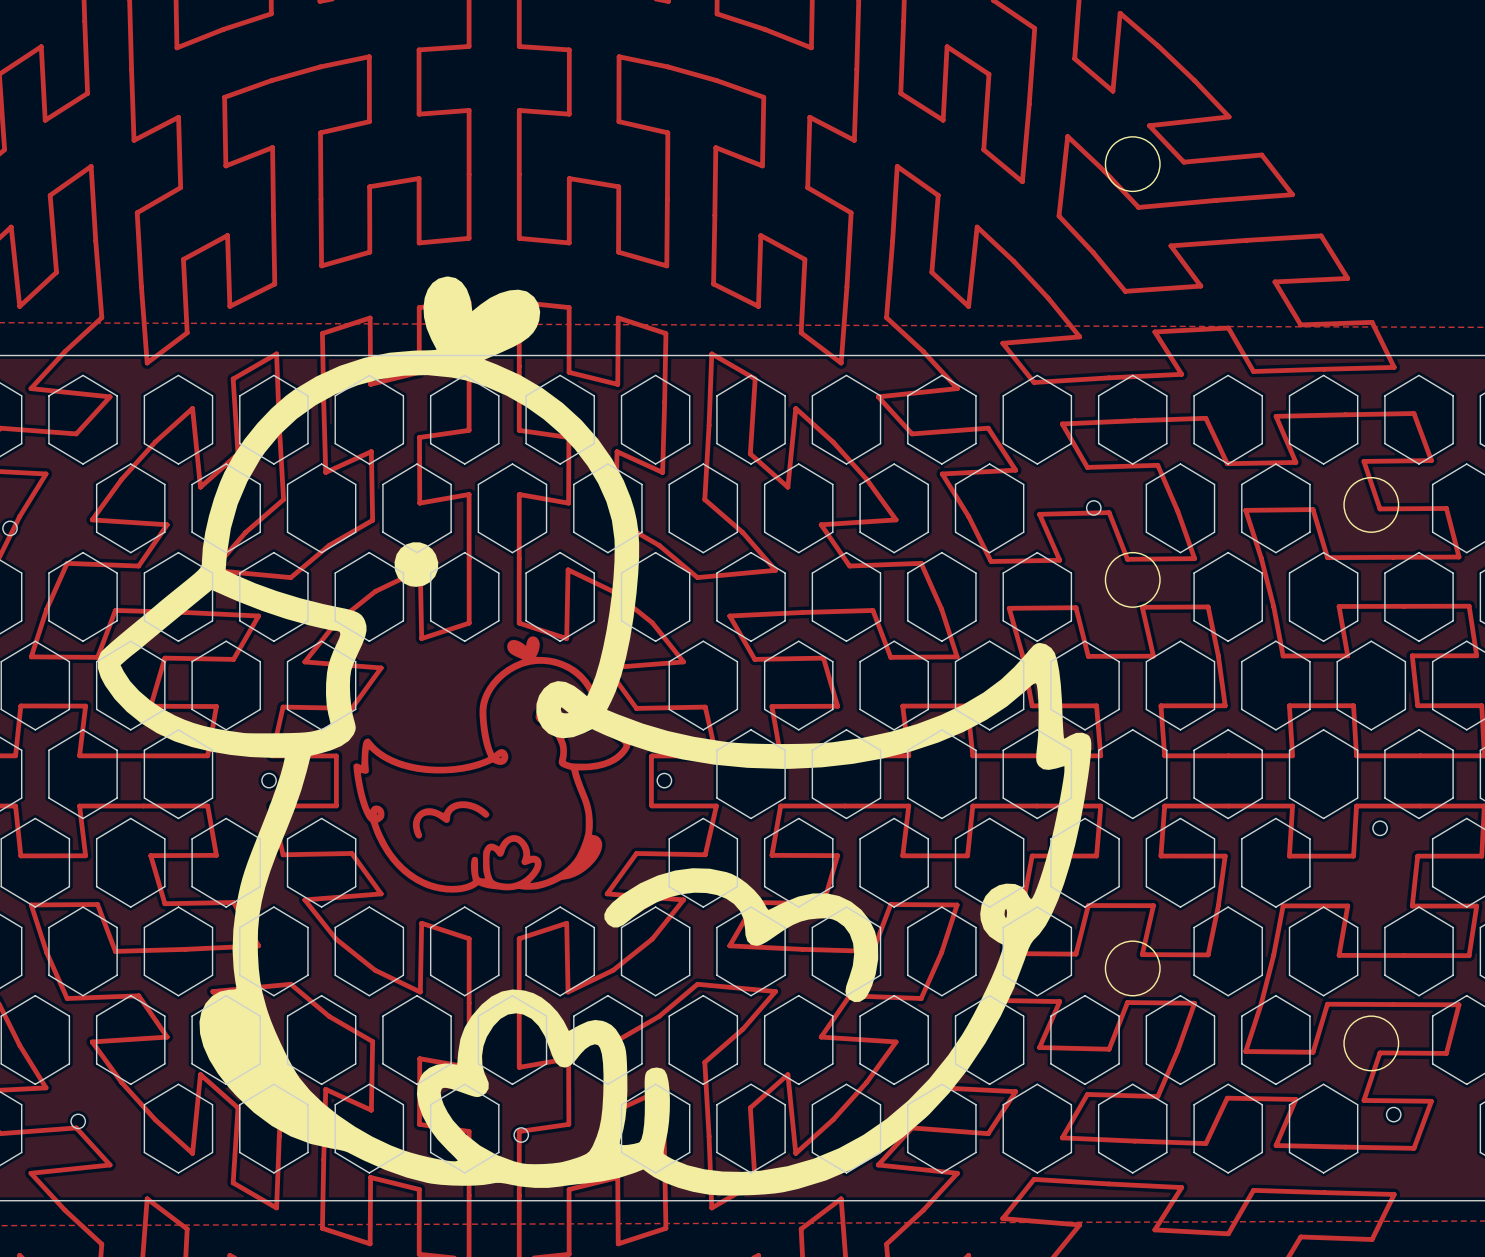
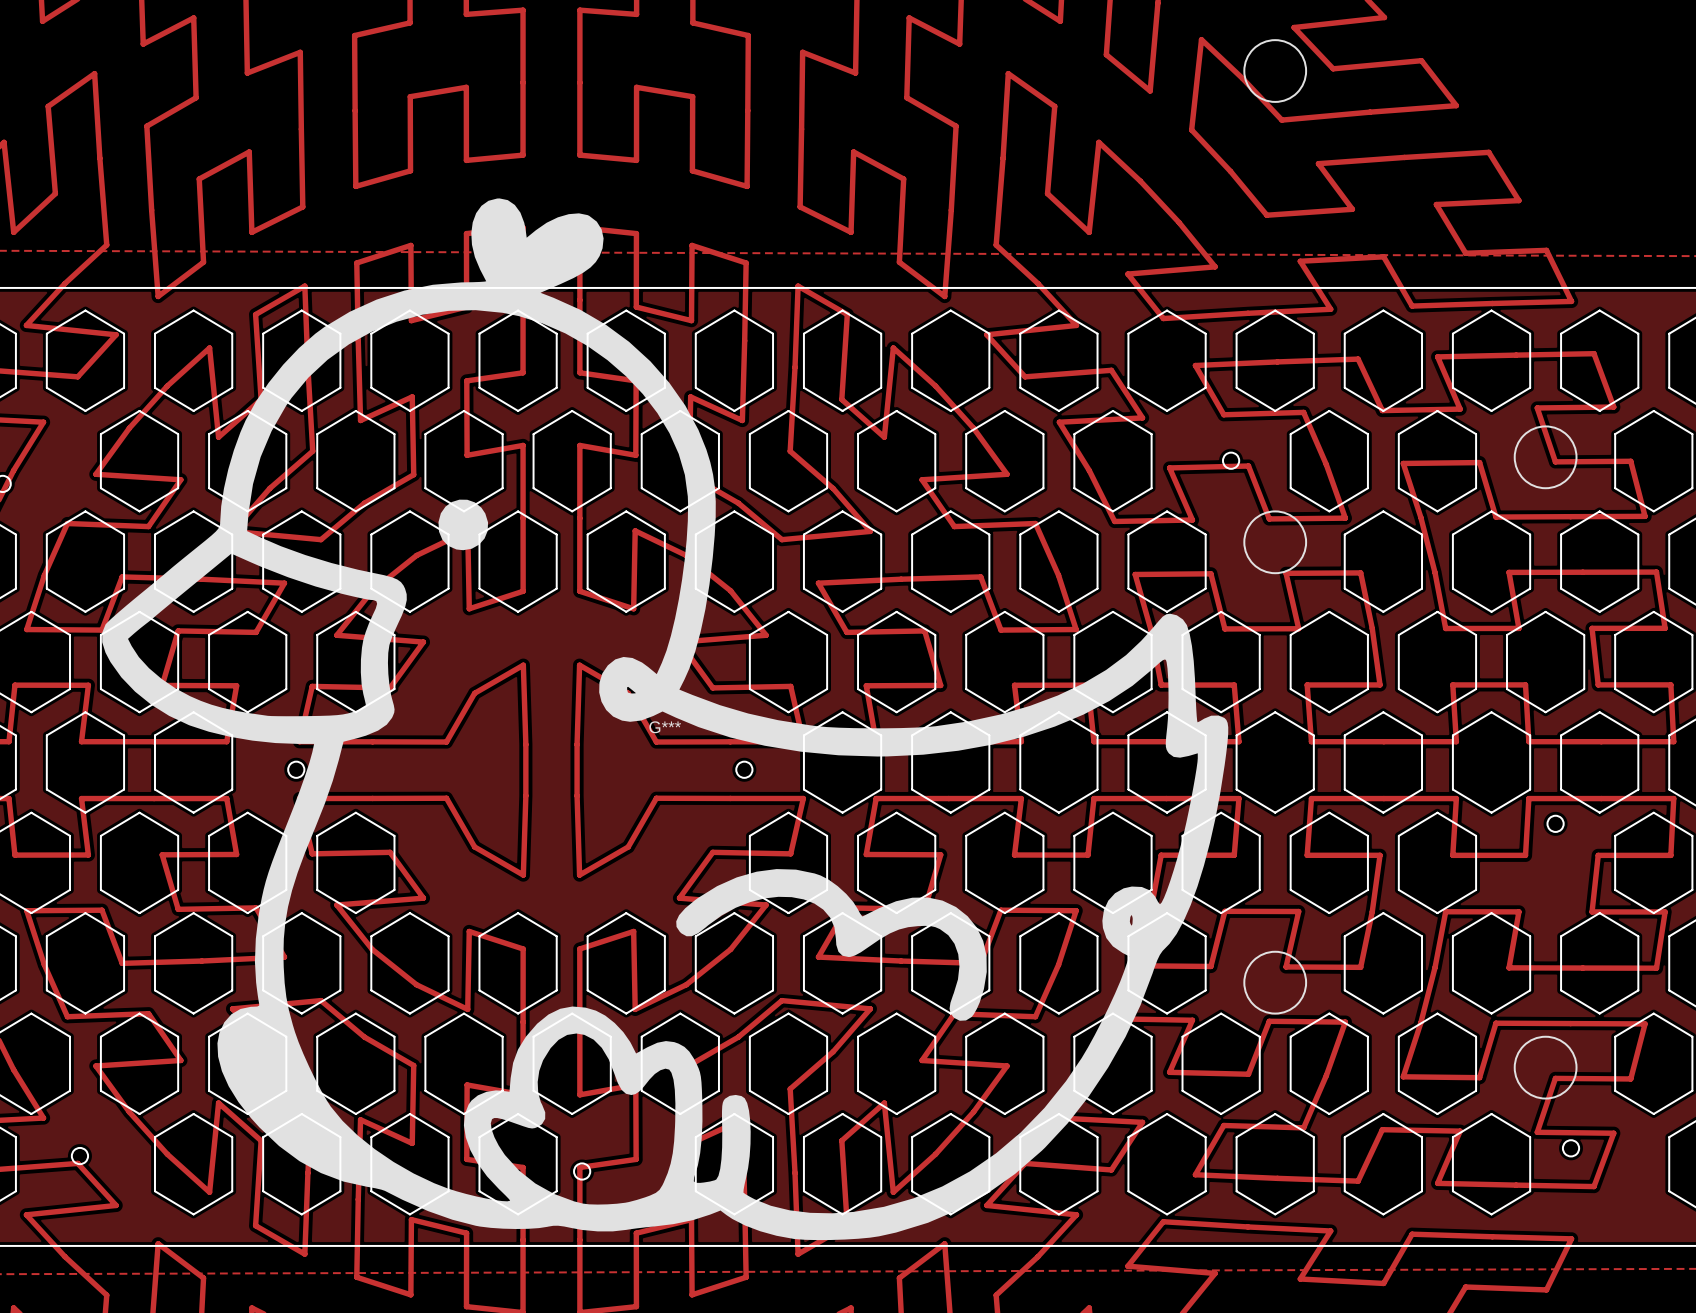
drawing: [97, 276, 1092, 1196] -> none
G***: none -> (665, 719)
top track: (336, 755) (336, 805) -> (372, 741) (446, 742) (474, 693) (523, 665) (525, 744) (523, 875) (474, 846) (446, 798) (372, 798)
top track: (651, 755) (651, 805) -> (730, 741) (656, 742) (628, 693) (579, 665) (577, 744) (579, 875) (628, 846) (656, 798) (730, 798)

